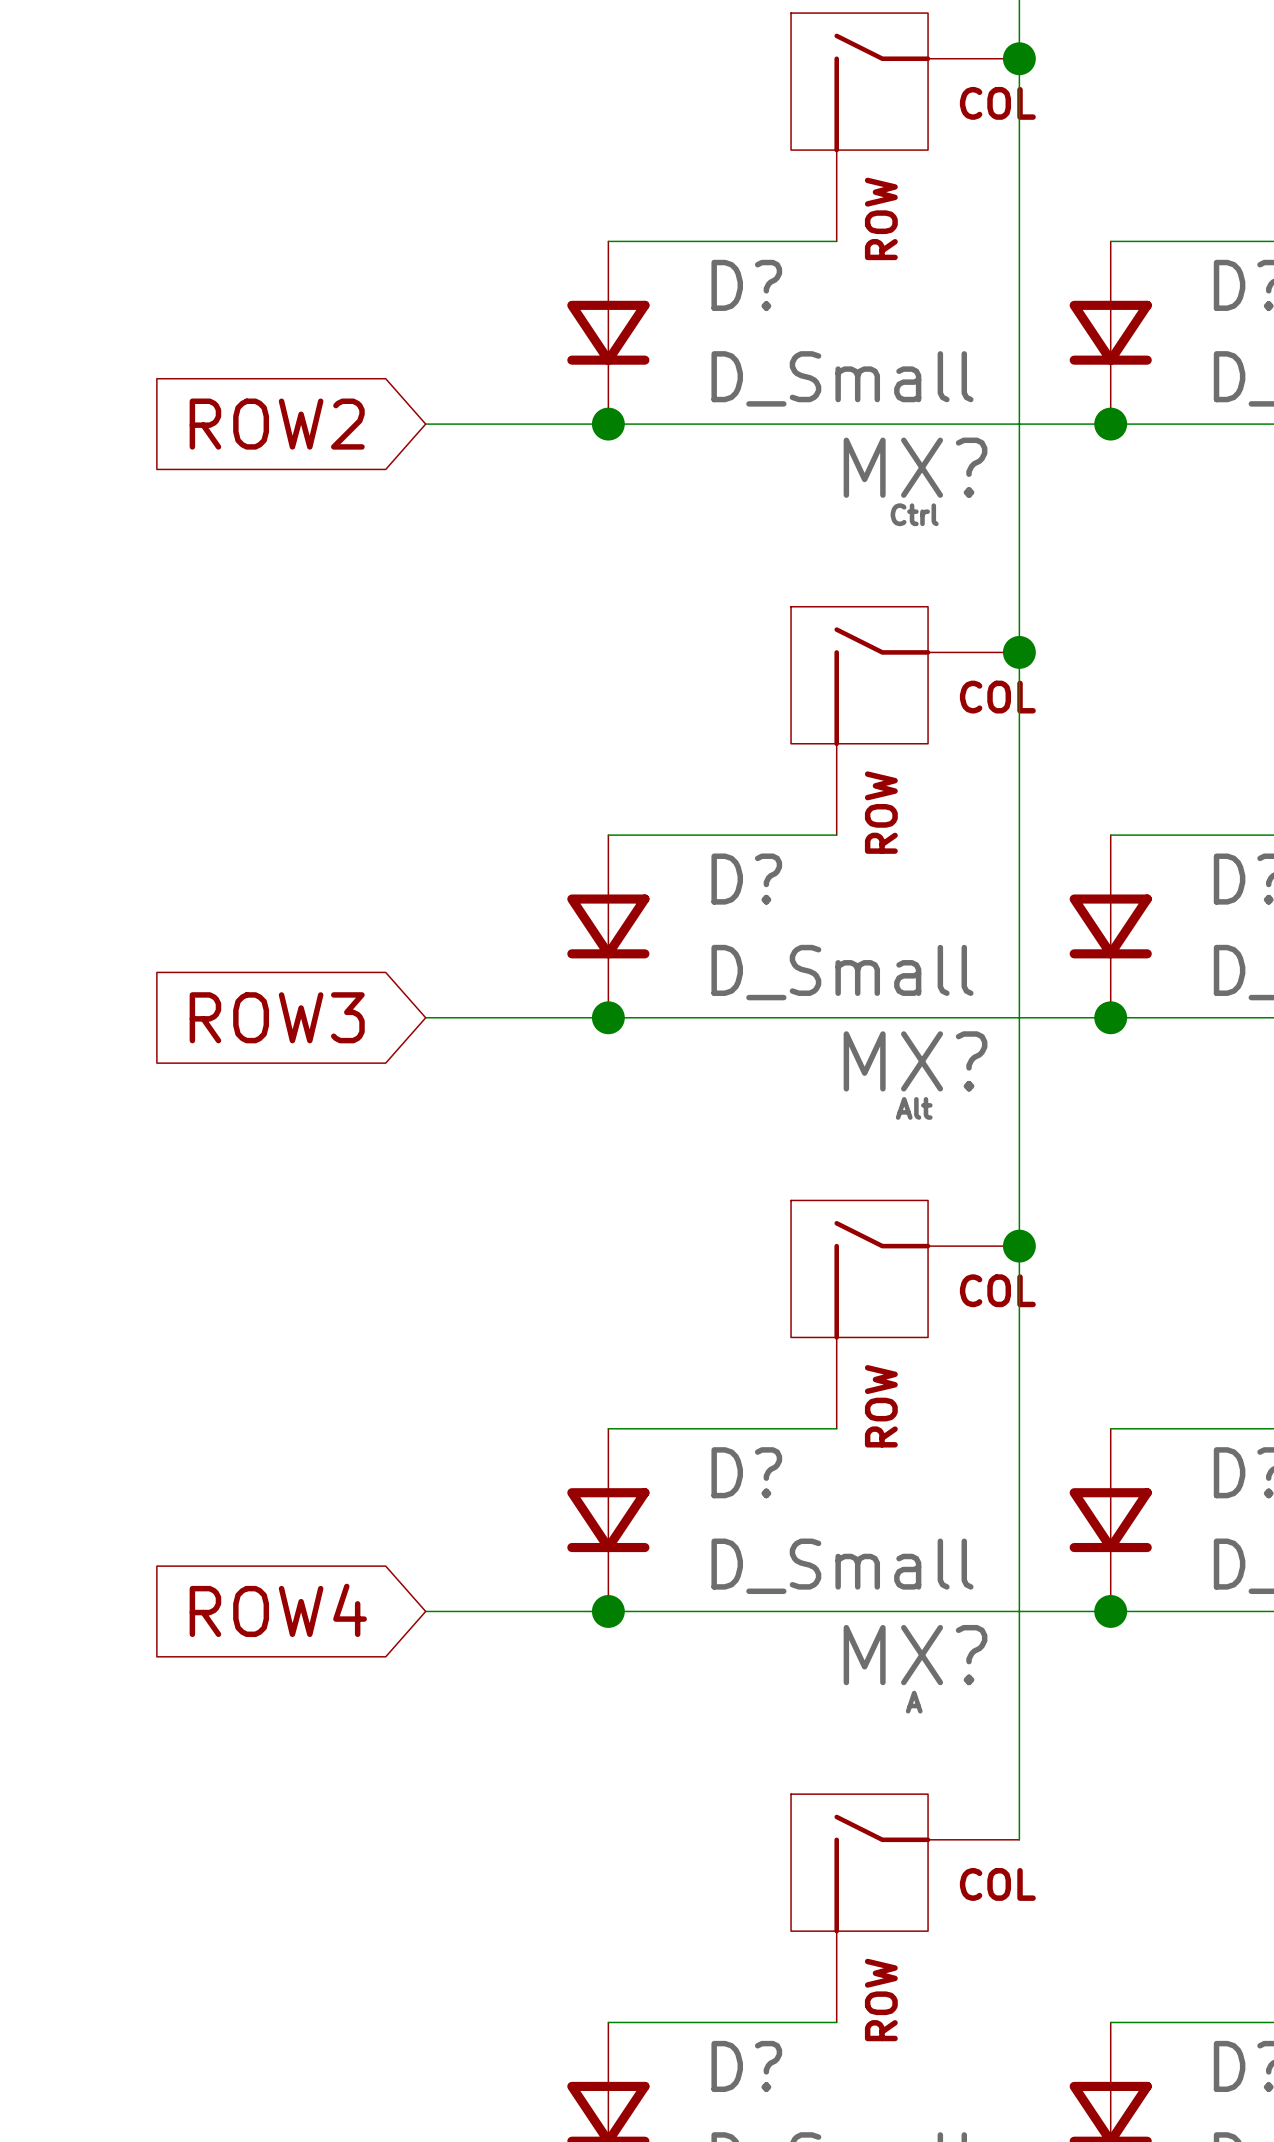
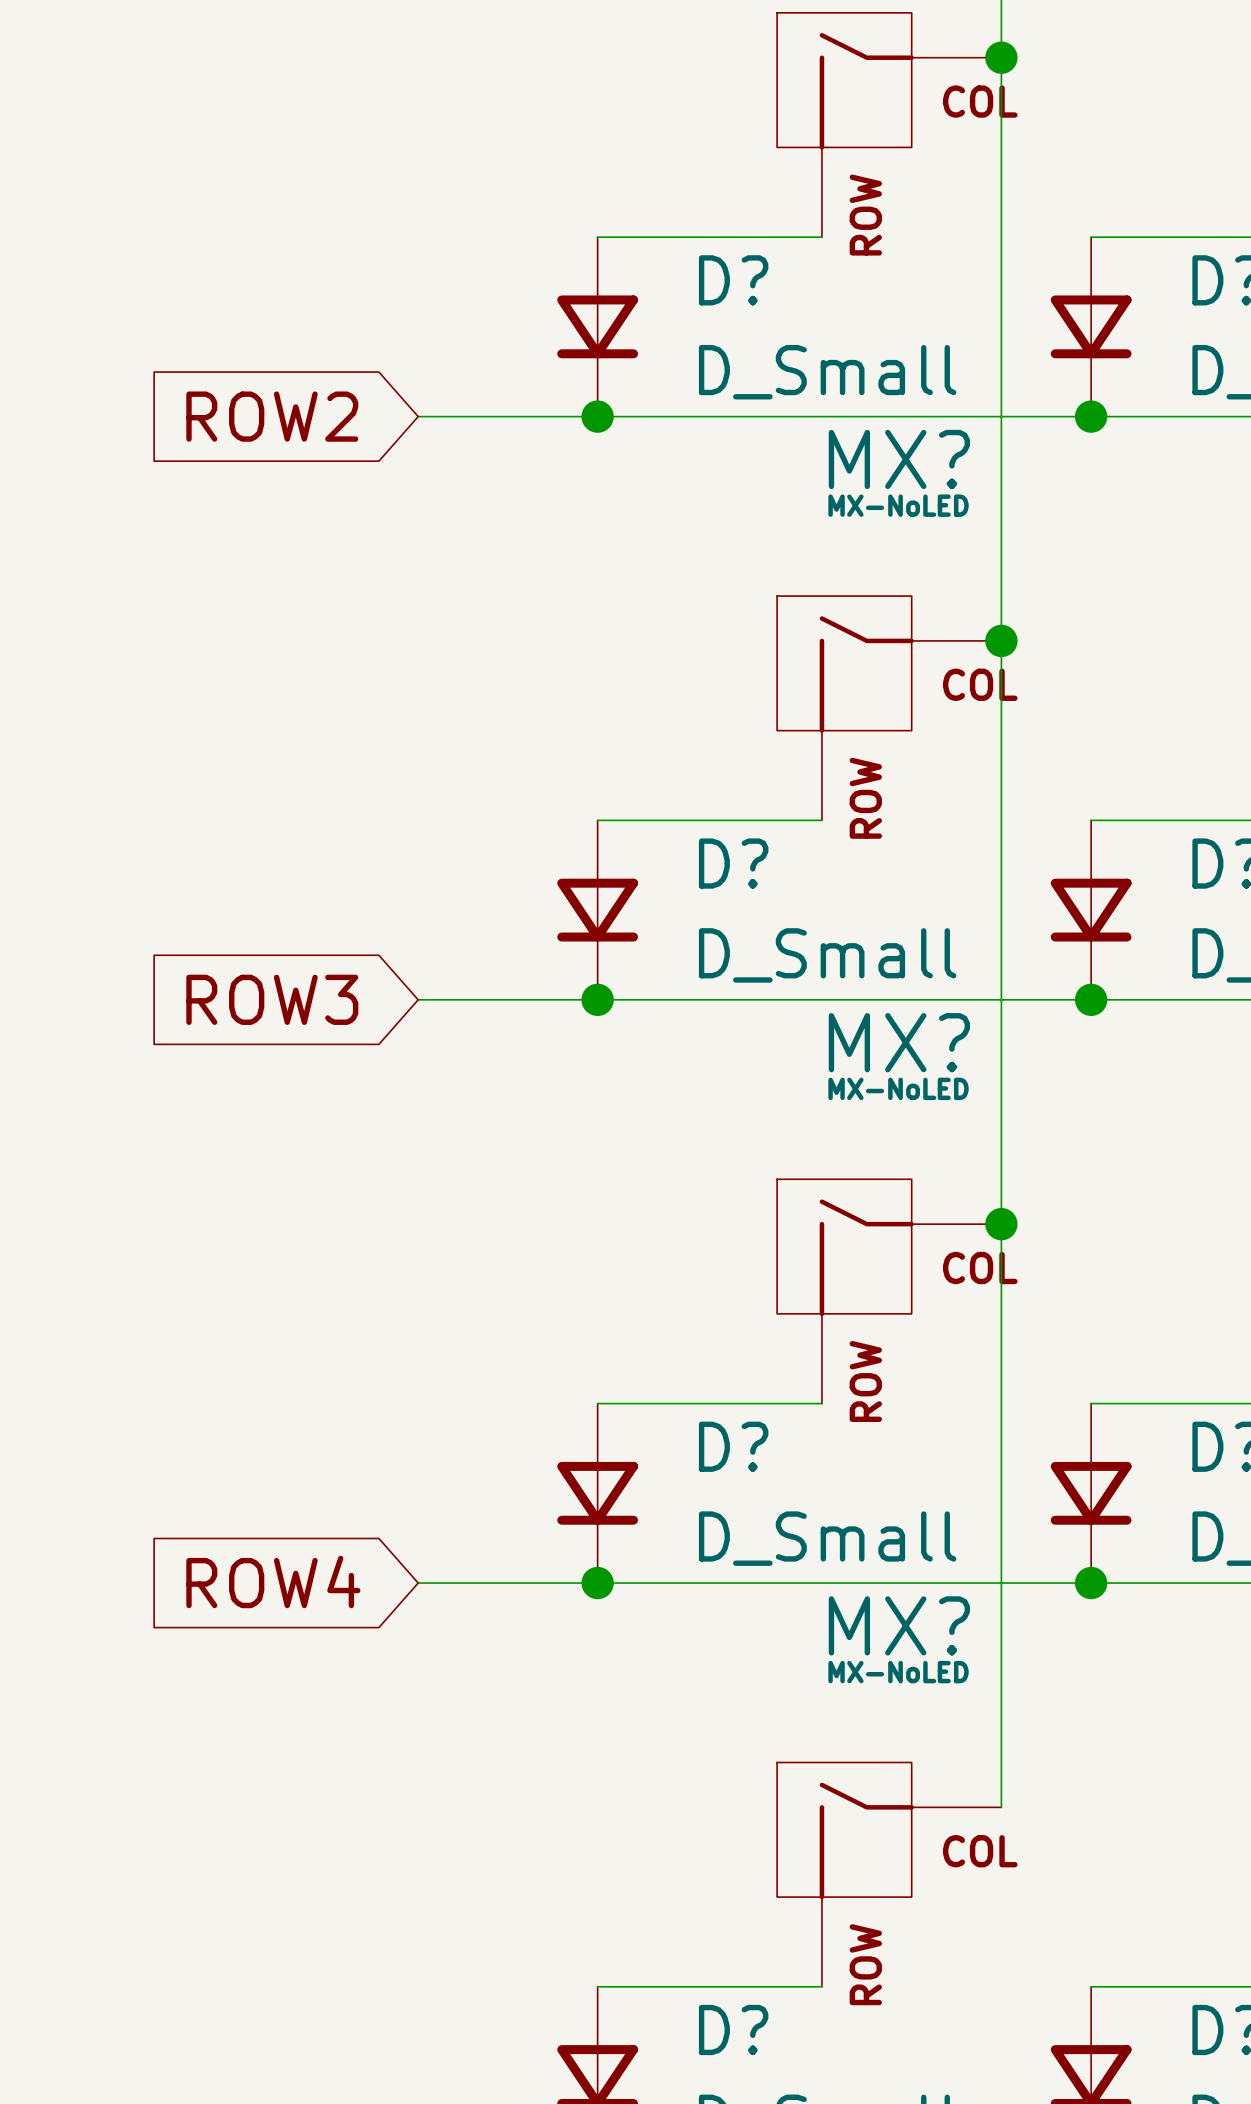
MX? value: Ctrl (914, 514) -> MX-NoLED (898, 505)
MX? value: Alt (914, 1108) -> MX-NoLED (898, 1088)
MX? value: A (914, 1702) -> MX-NoLED (898, 1672)

